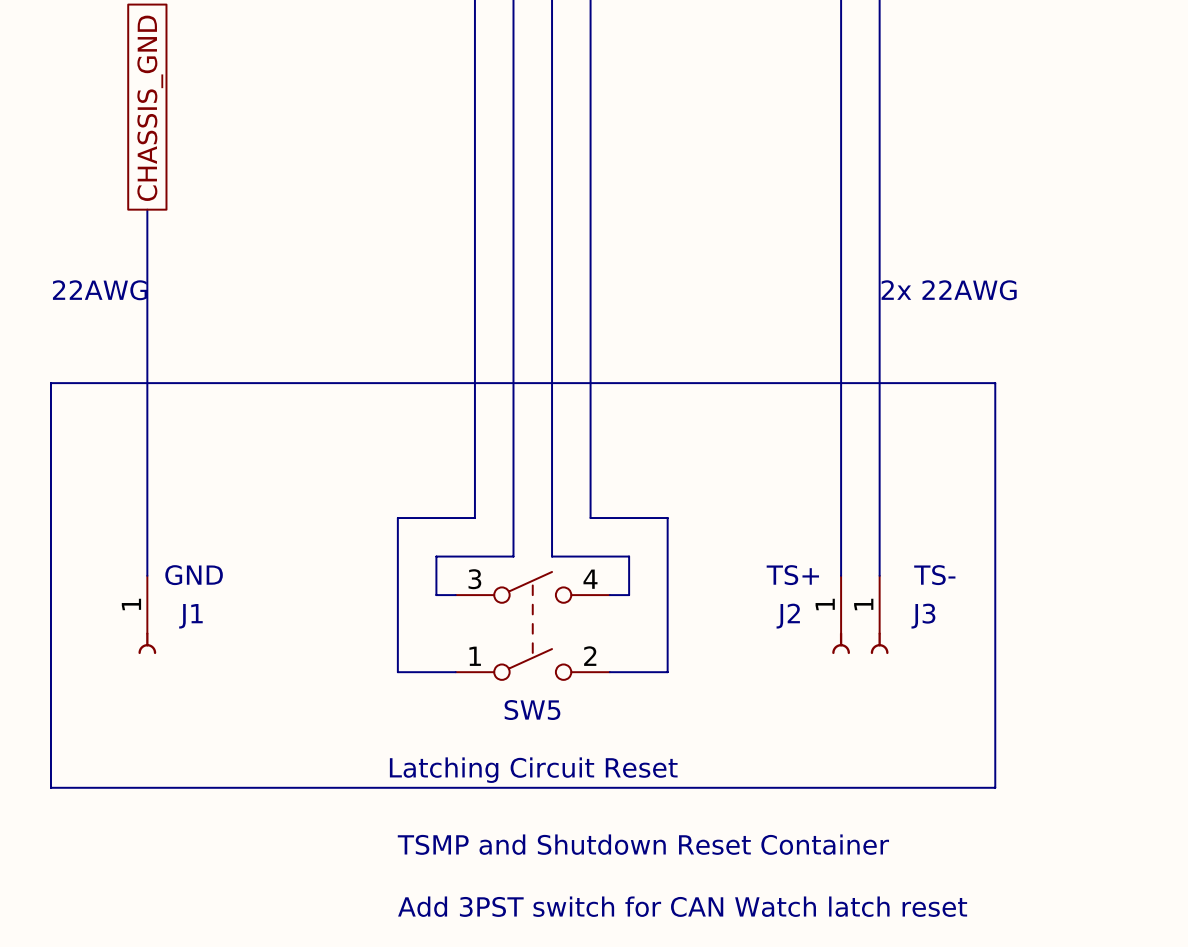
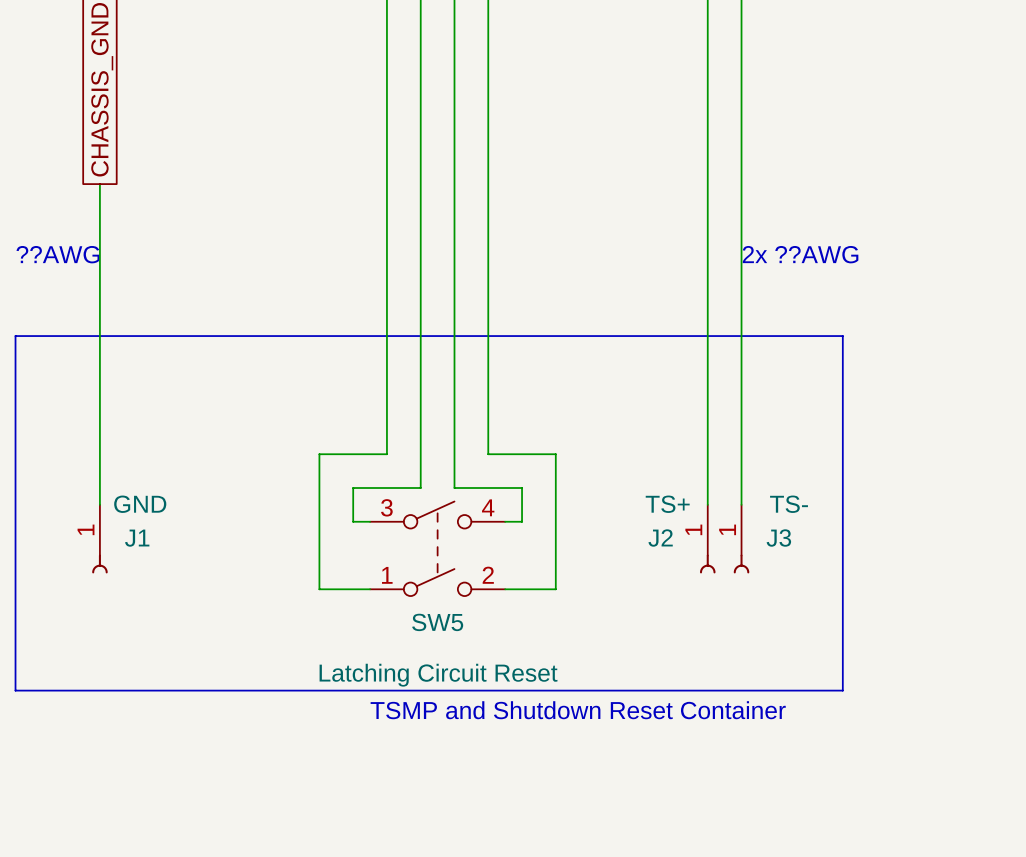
text: 22AWG (100, 290) -> ??AWG (58, 254)
text: 2x 22AWG (949, 290) -> 2x ??AWG (800, 254)
text position: TSMP and Shutdown Reset Container (643, 844) -> TSMP and Shutdown Reset Container (578, 710)
text: Add 3PST switch for CAN Watch latch reset (682, 906) -> none

